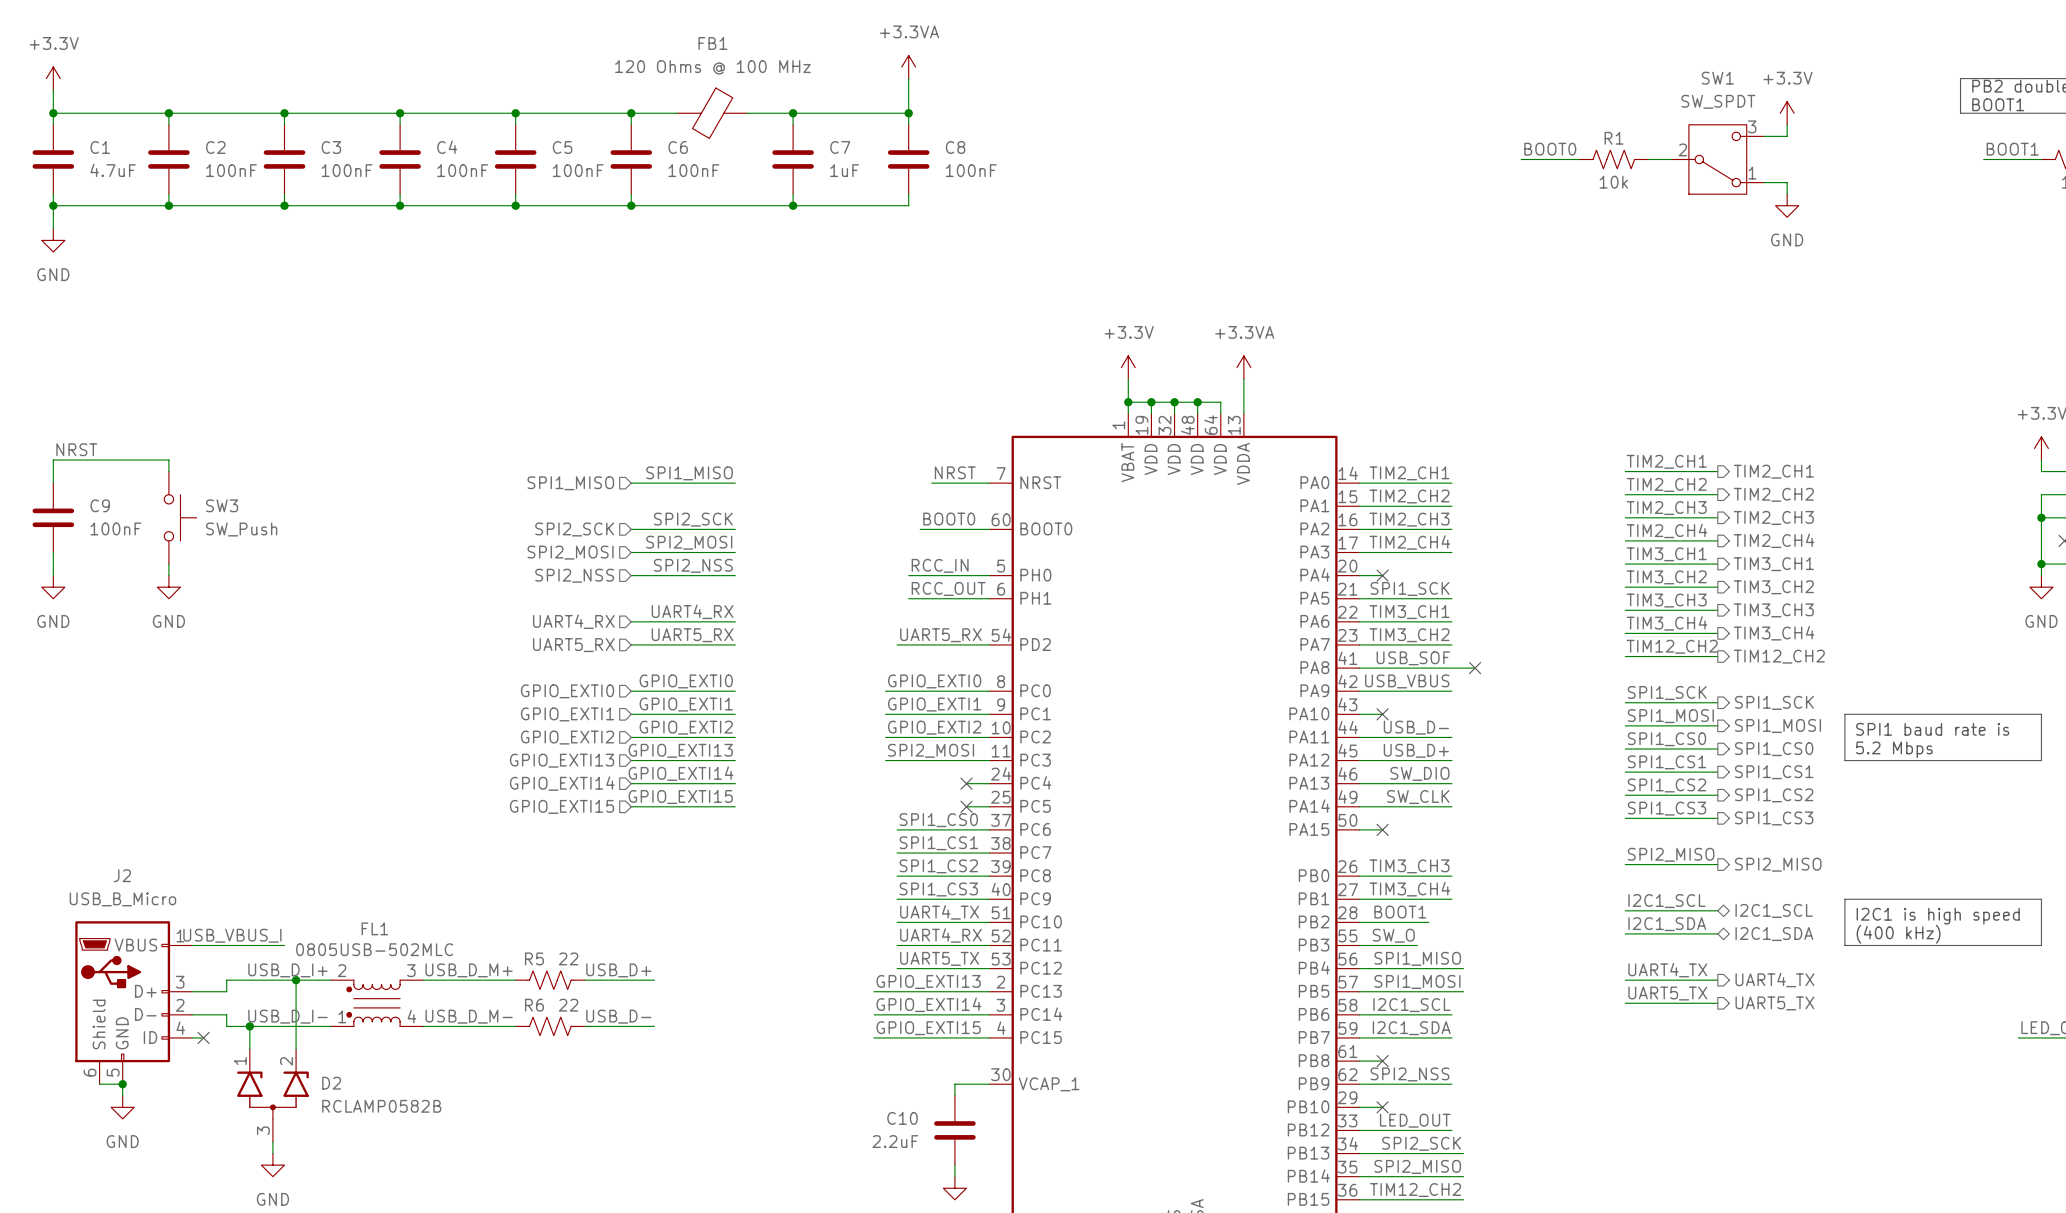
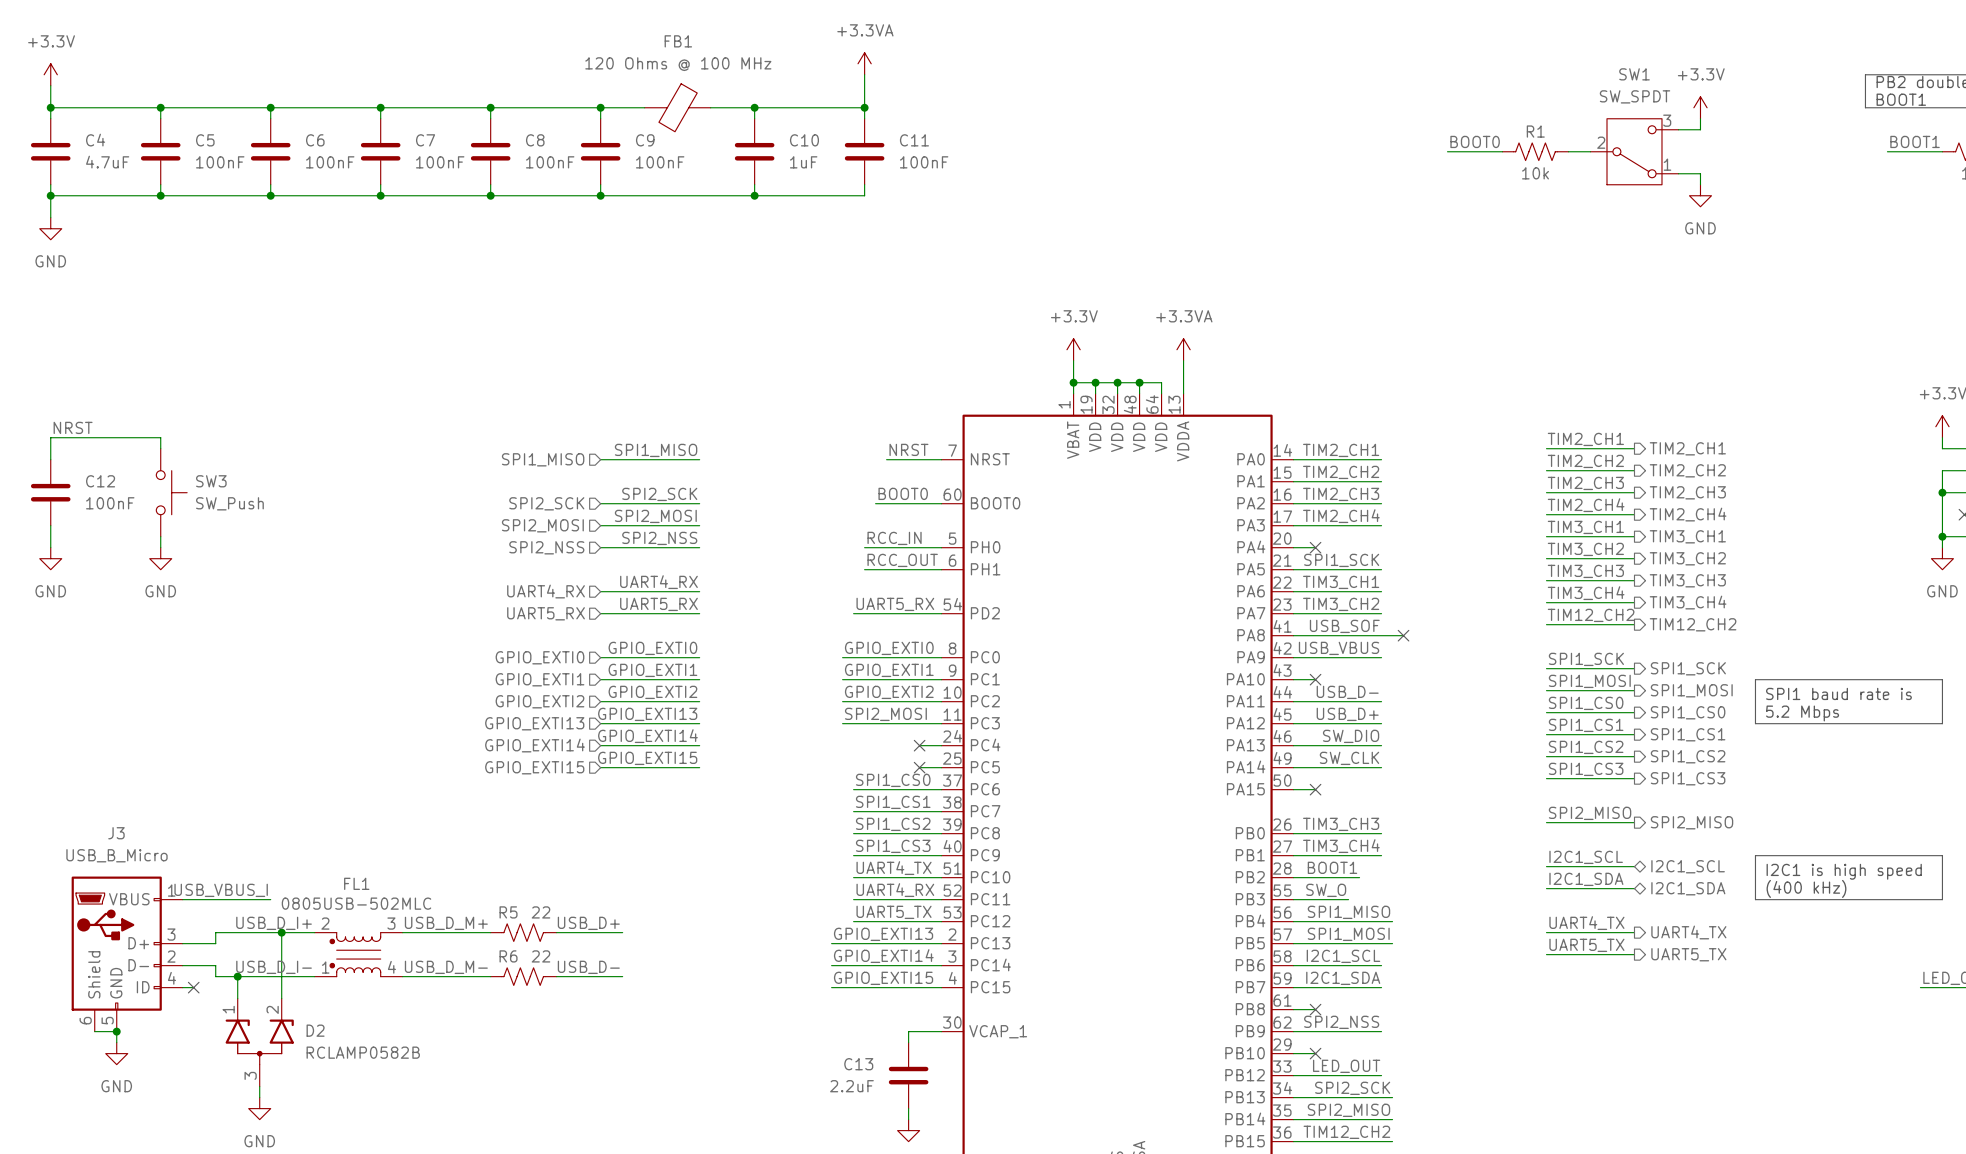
C1 name: C1 (100, 147) -> C4 (95, 140)
C2 name: C2 (215, 147) -> C5 (205, 140)
C3 name: C3 (331, 147) -> C6 (315, 140)
C4 name: C4 (447, 147) -> C7 (425, 140)
C5 name: C5 (562, 147) -> C8 (535, 140)
C6 name: C6 (678, 147) -> C9 (645, 140)
C7 name: C7 (840, 147) -> C10 (804, 140)
C8 name: C8 (955, 147) -> C11 (914, 140)
C9 name: C9 (100, 505) -> C12 (100, 481)
J2 name: J2 (122, 875) -> J3 (116, 833)
C10 name: C10 (902, 1118) -> C13 (858, 1064)

